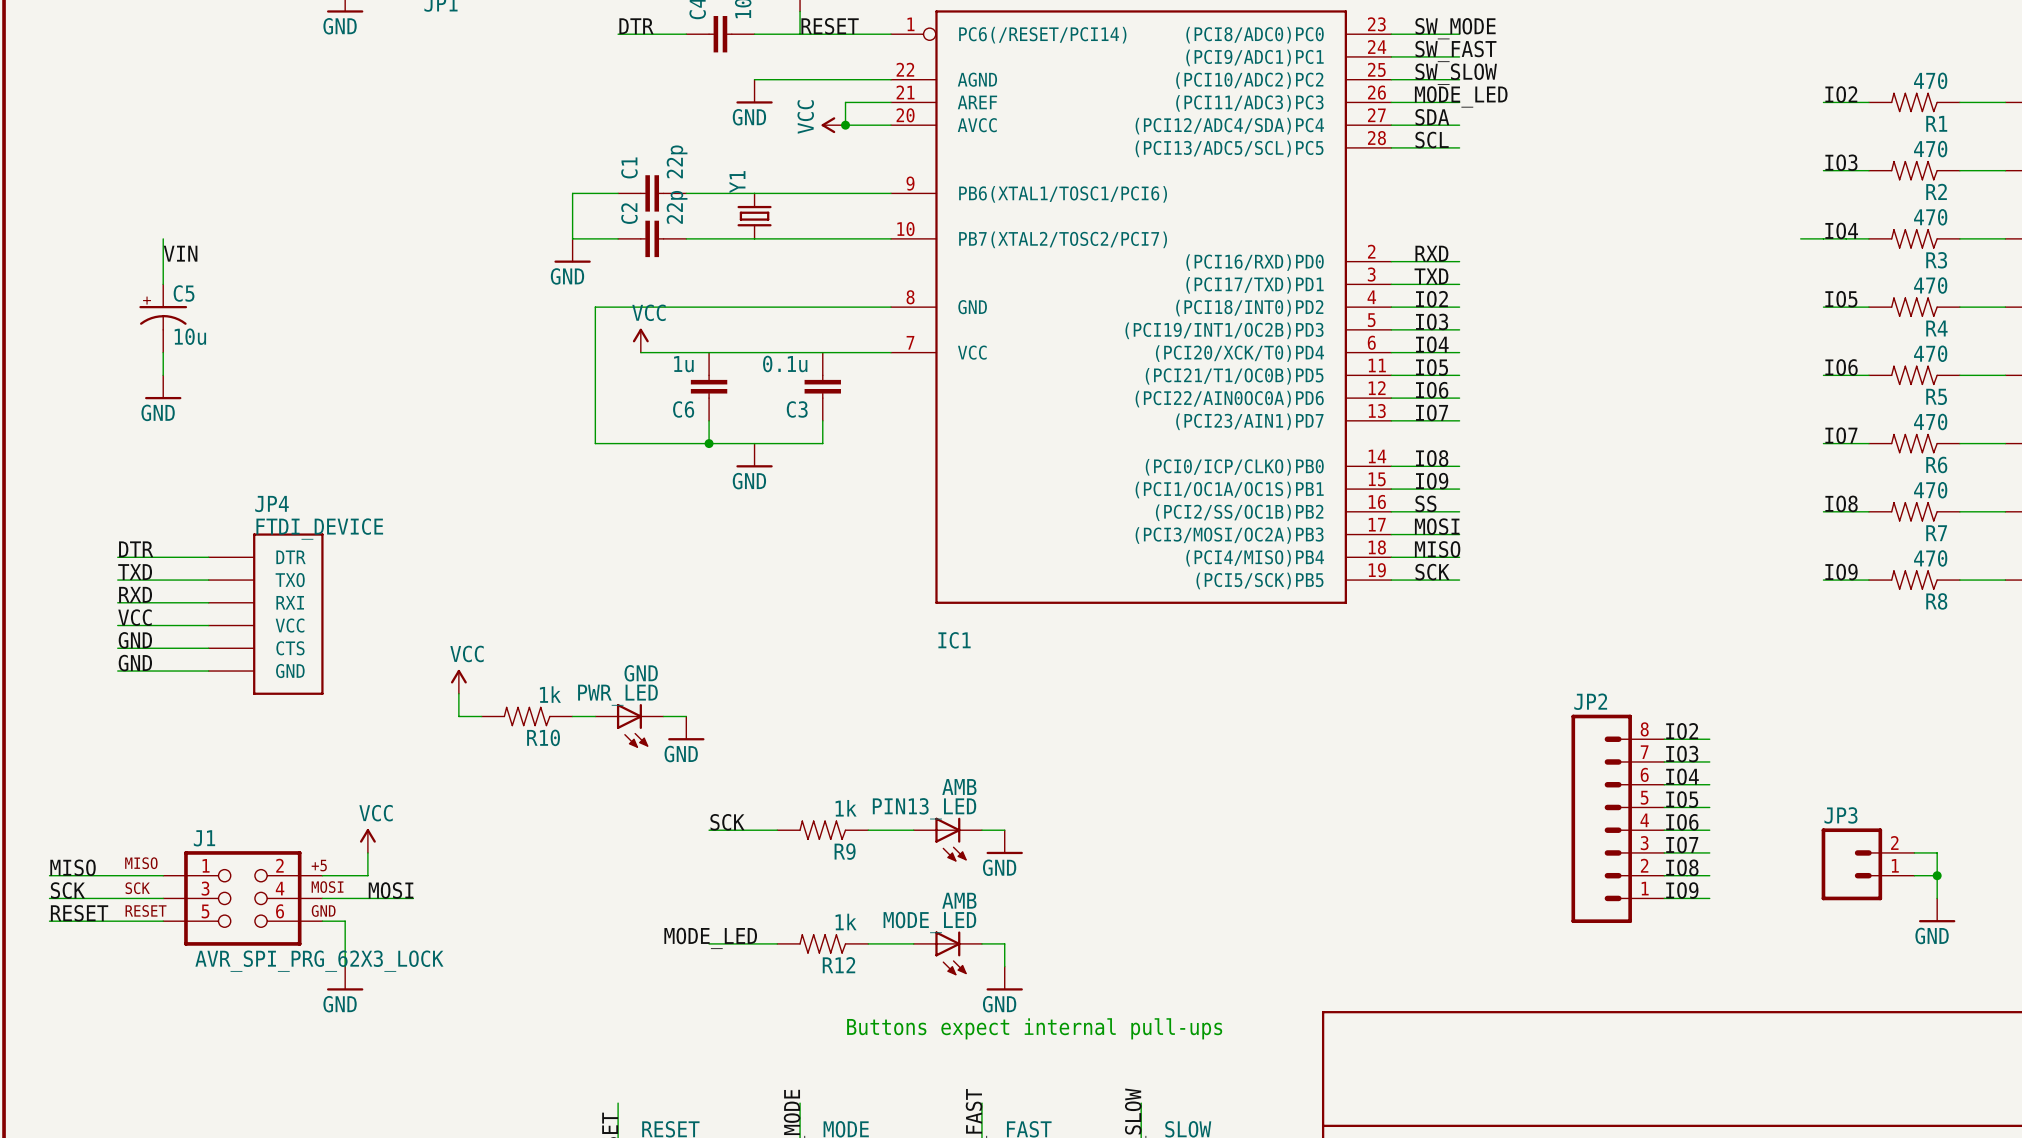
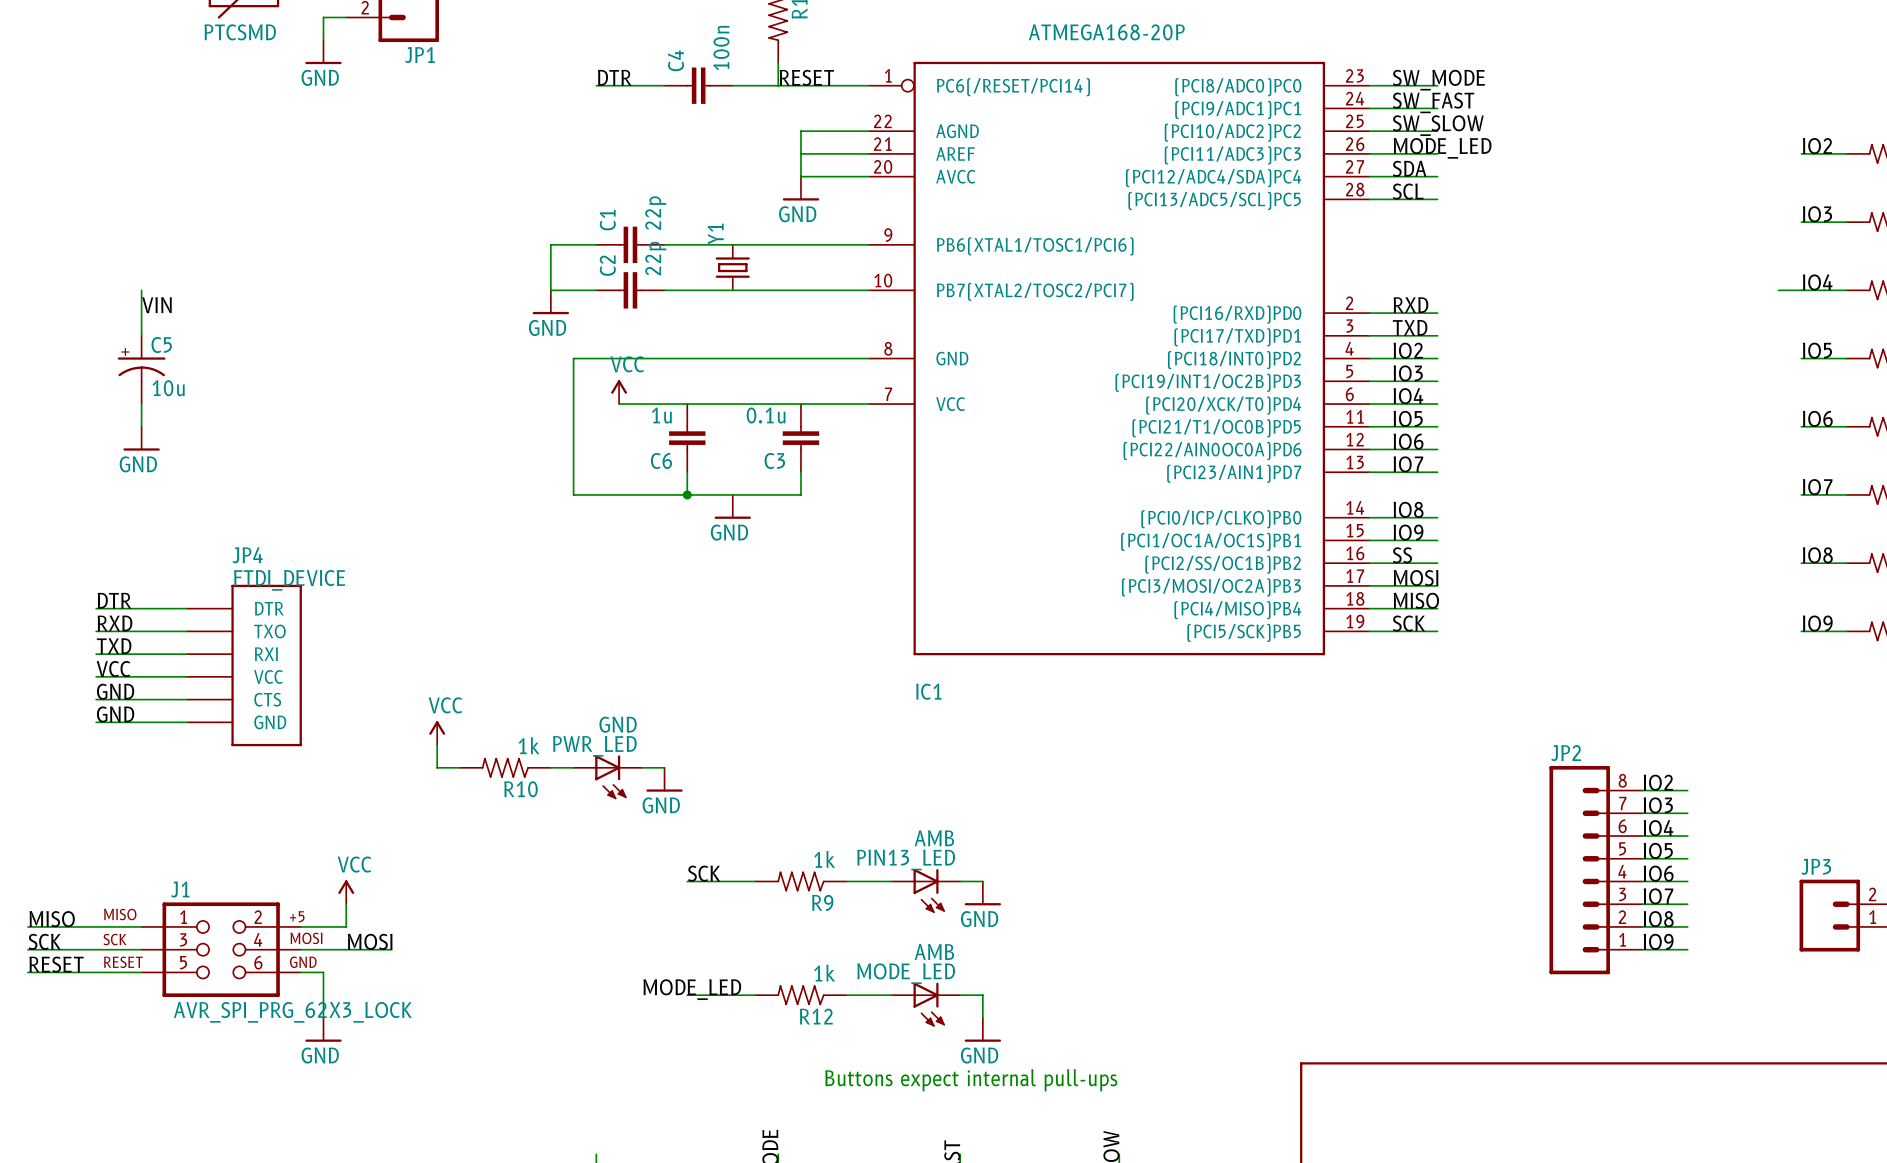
wire: (754, 79) (822, 79) -> none
power symbol position: GND (754, 91) -> GND (800, 188)
wire: none -> (800, 153) (823, 153)
wire: (845, 102) (845, 125) -> (800, 131) (800, 176) (823, 176)
power symbol: VCC (833, 125) -> none
junction: (845, 125) -> none
label: TXD (135, 572) -> RXD (114, 623)
label: RXD (135, 594) -> TXD (114, 646)

